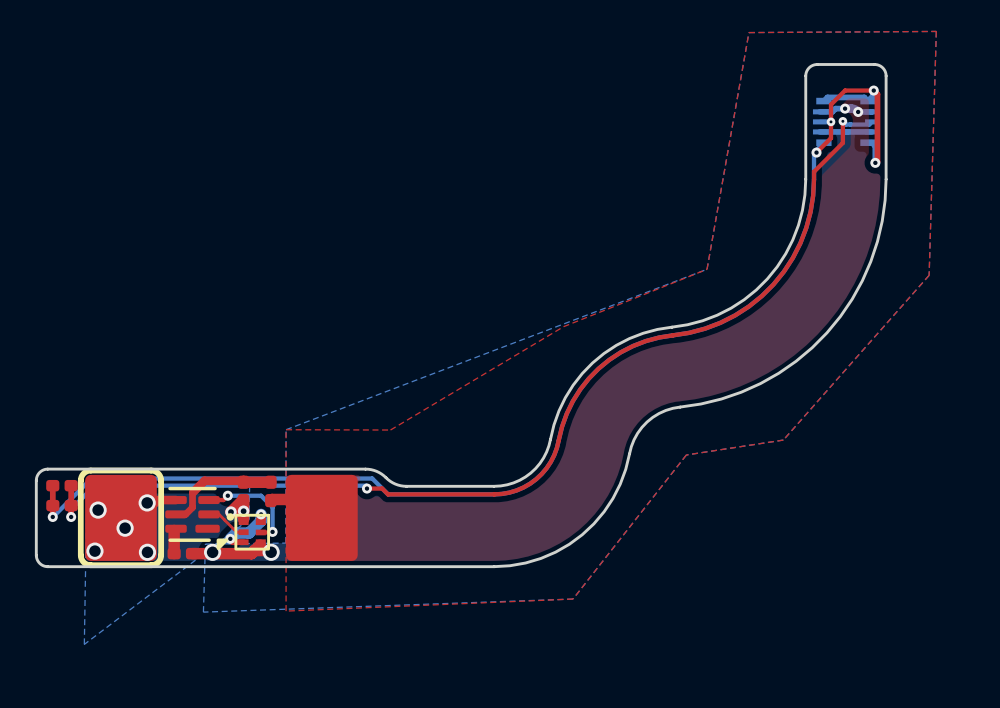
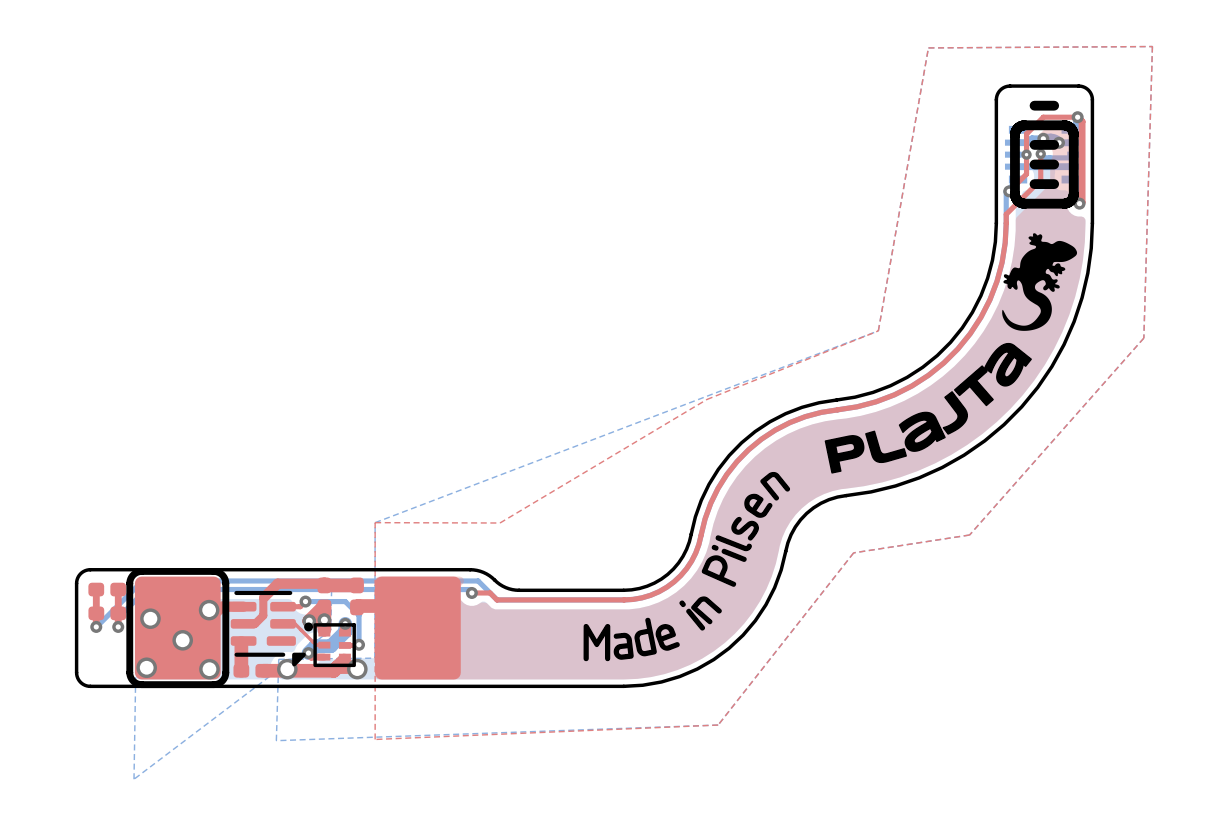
line: none -> (1034, 105) (1054, 105)
line: none -> (1024, 125) (1063, 125)
line: none -> (1014, 135) (1014, 193)
line: none -> (1073, 135) (1073, 193)
line: none -> (1034, 144) (1054, 144)
line: none -> (1034, 164) (1054, 164)
line: none -> (1034, 184) (1054, 184)
line: none -> (1024, 203) (1063, 203)
drawing: none -> [583, 233, 1078, 662]

